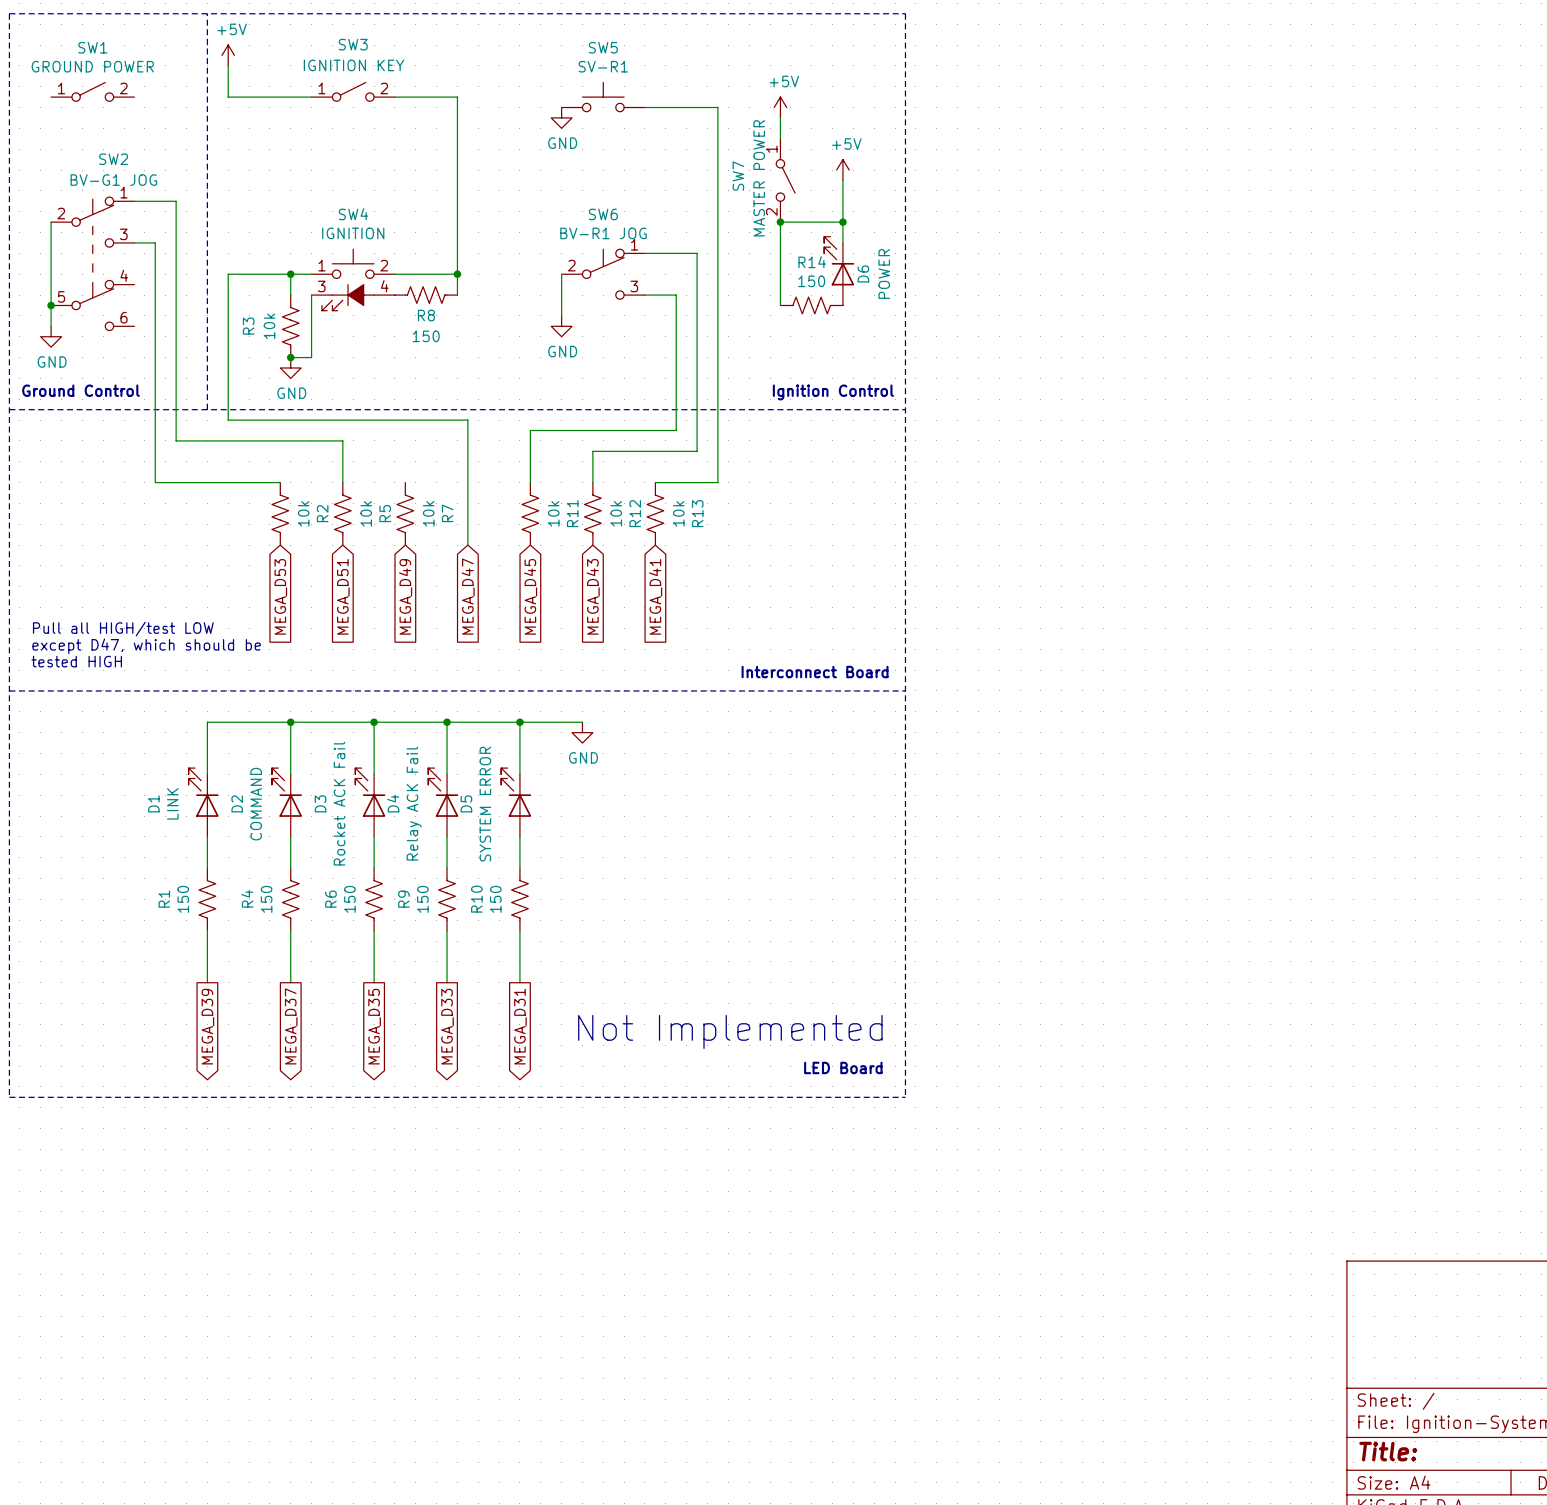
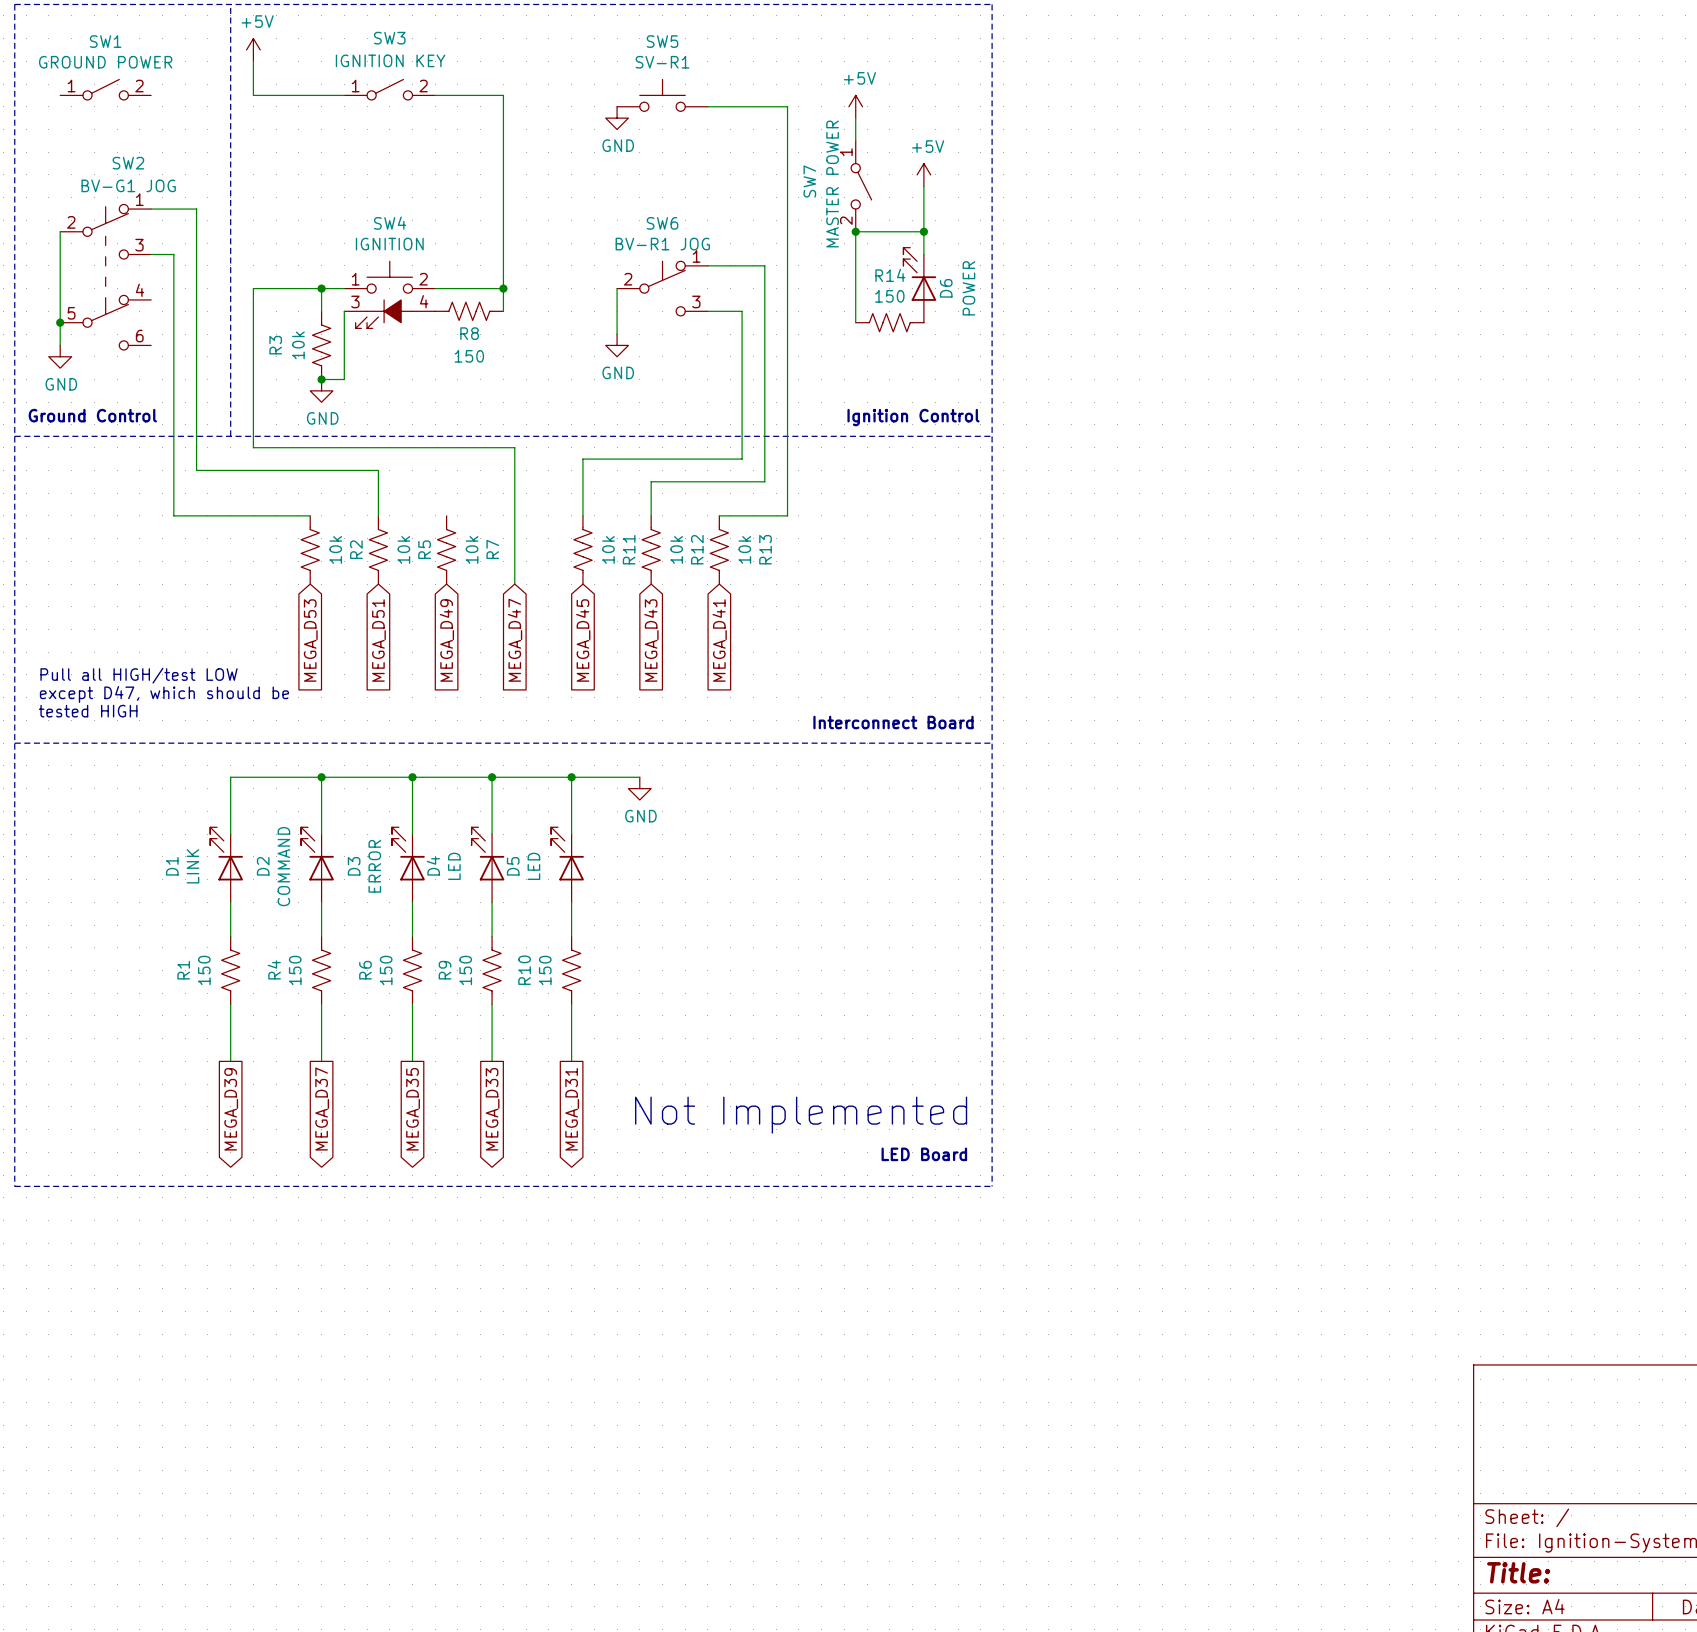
D3 value: Rocket ACK Fail (339, 803) -> ERROR (374, 866)
D4 value: Relay ACK Fail (414, 803) -> LED (454, 866)
D5 value: SYSTEM ERROR (485, 804) -> LED (533, 866)

